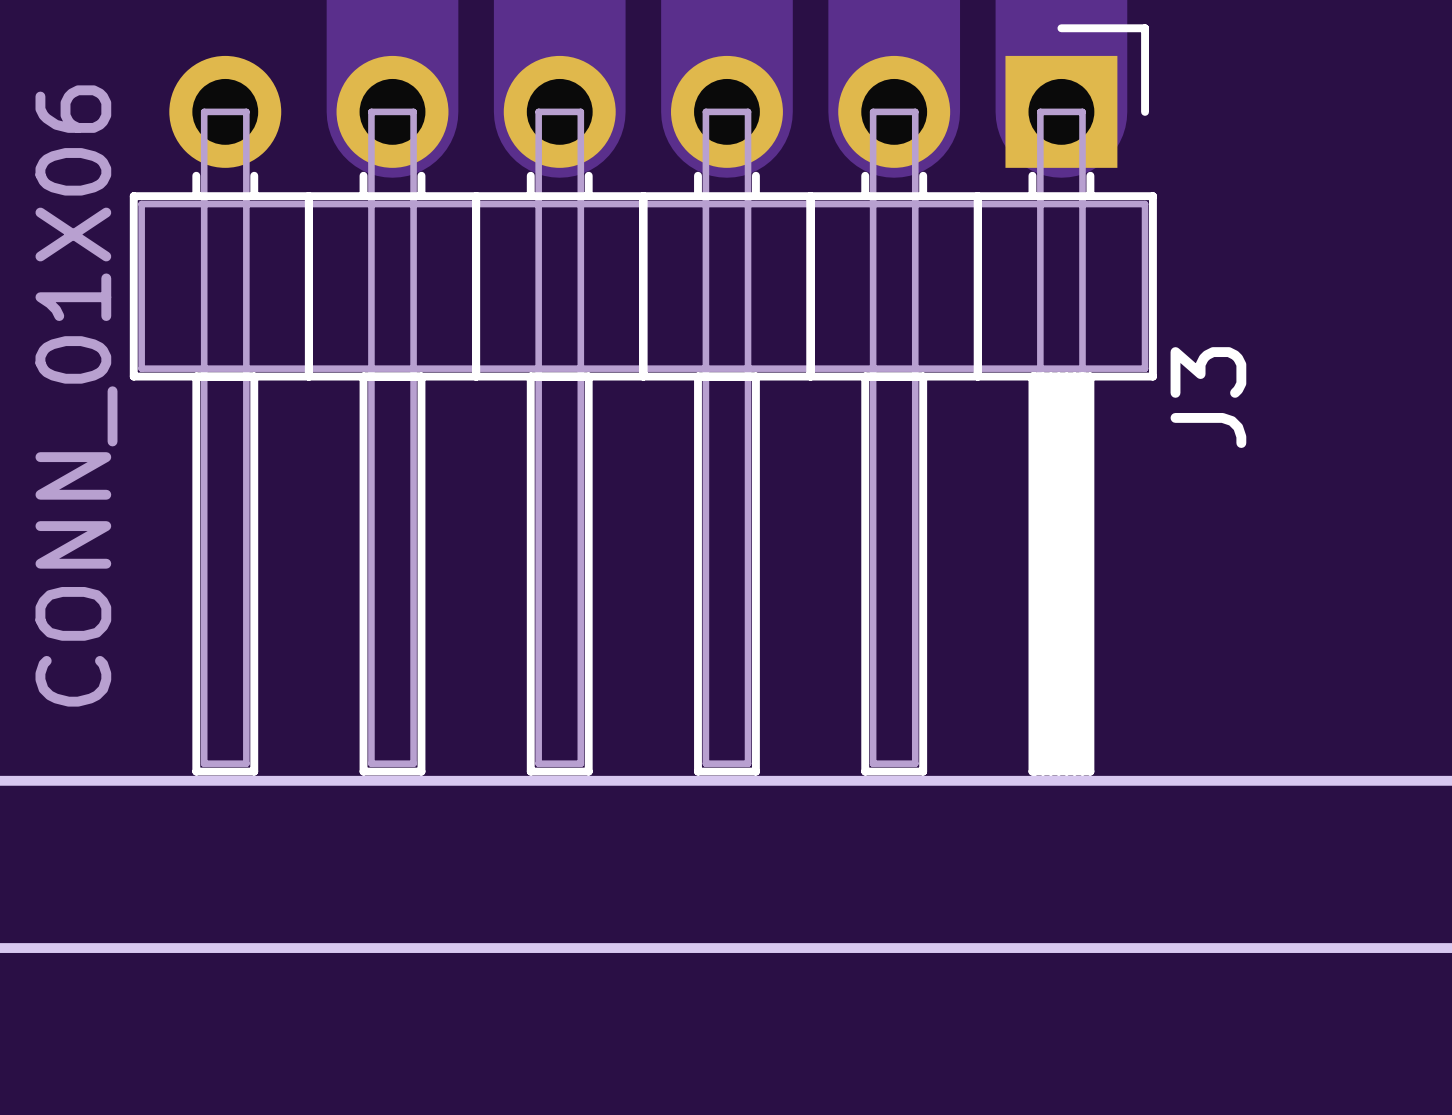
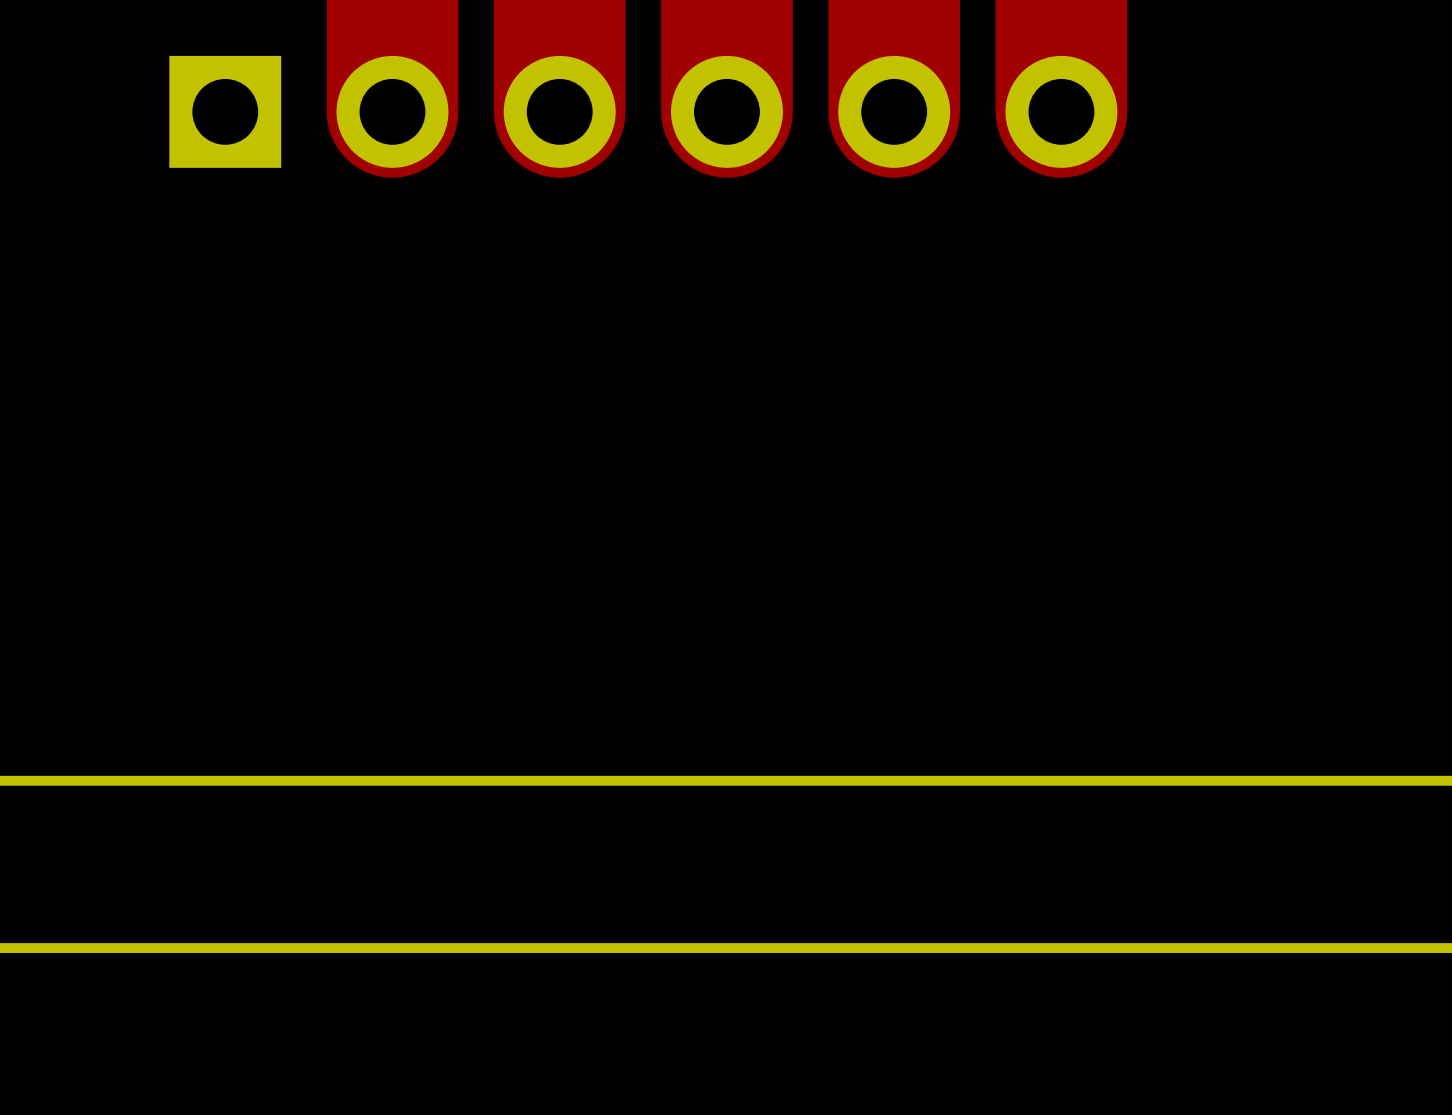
J3 side: top (643, 399) -> bottom (643, 111)

